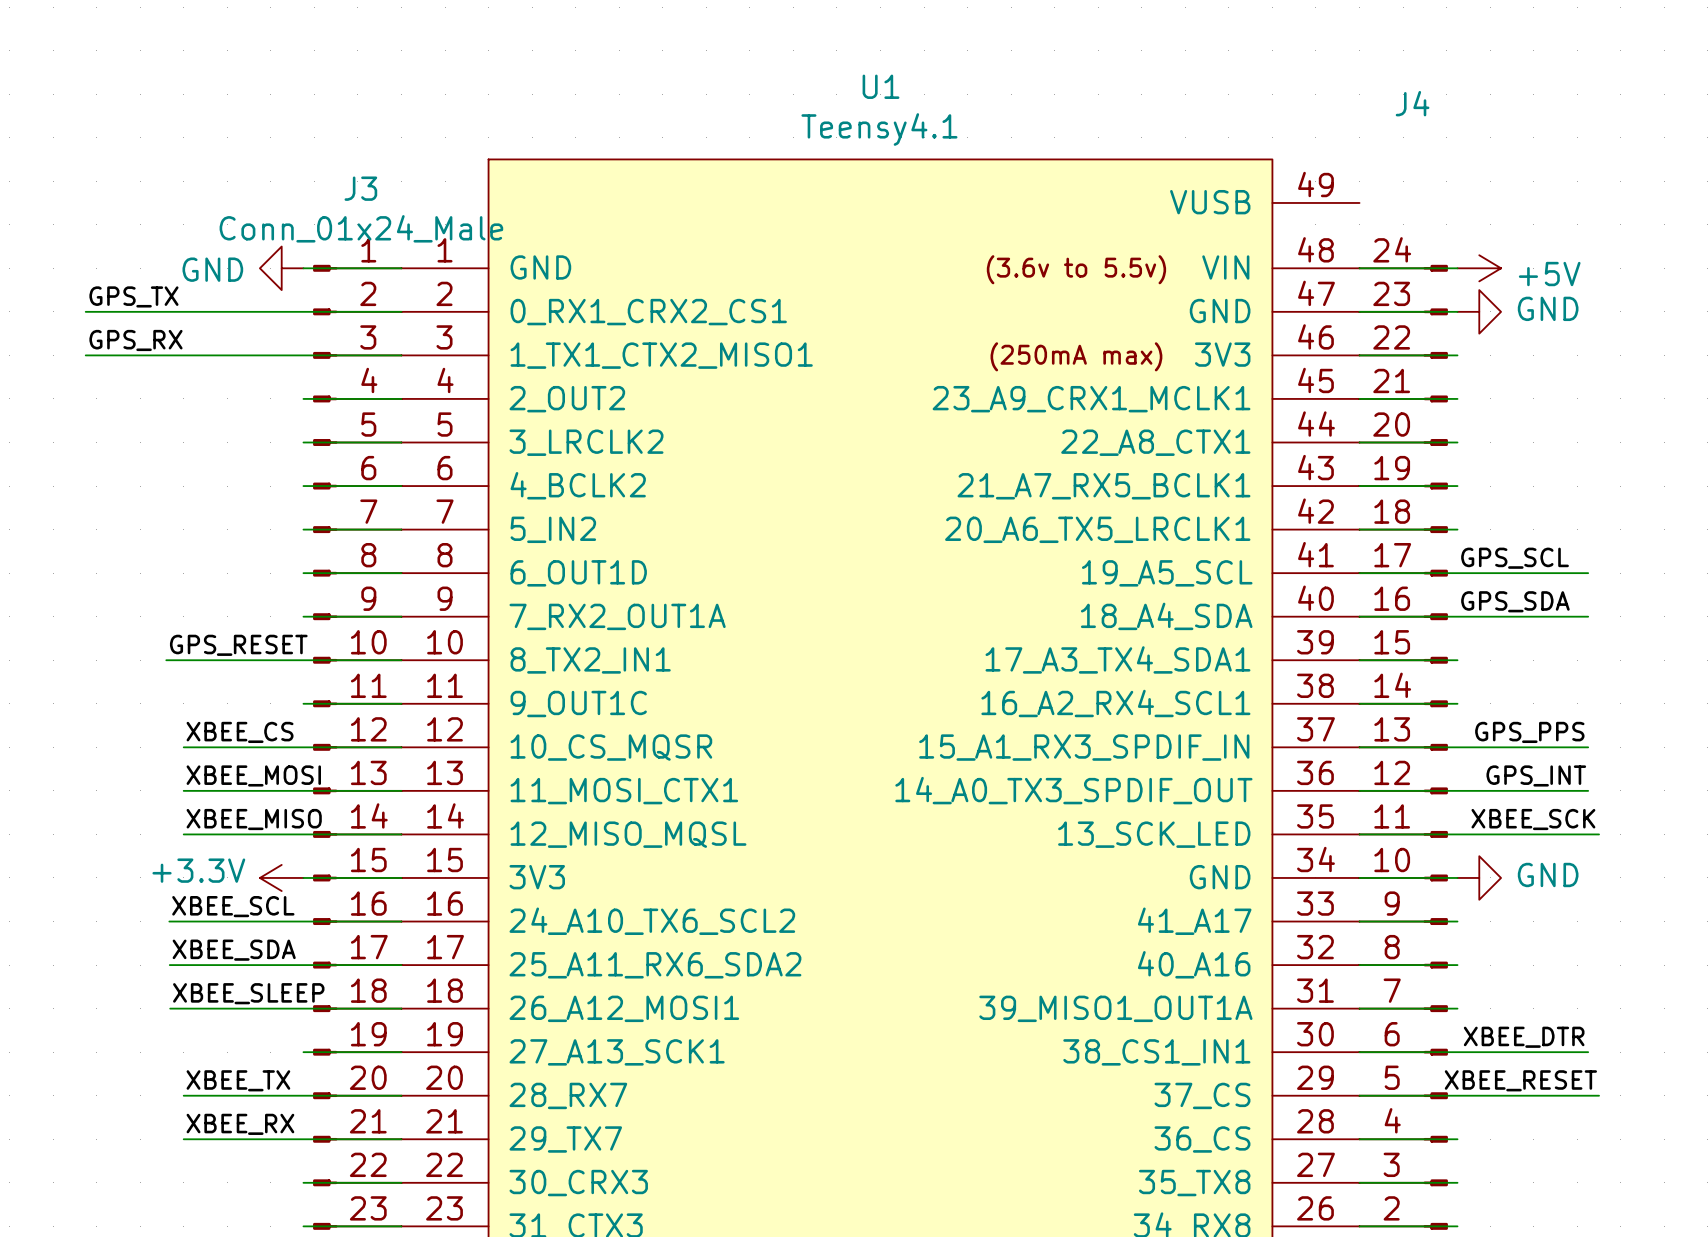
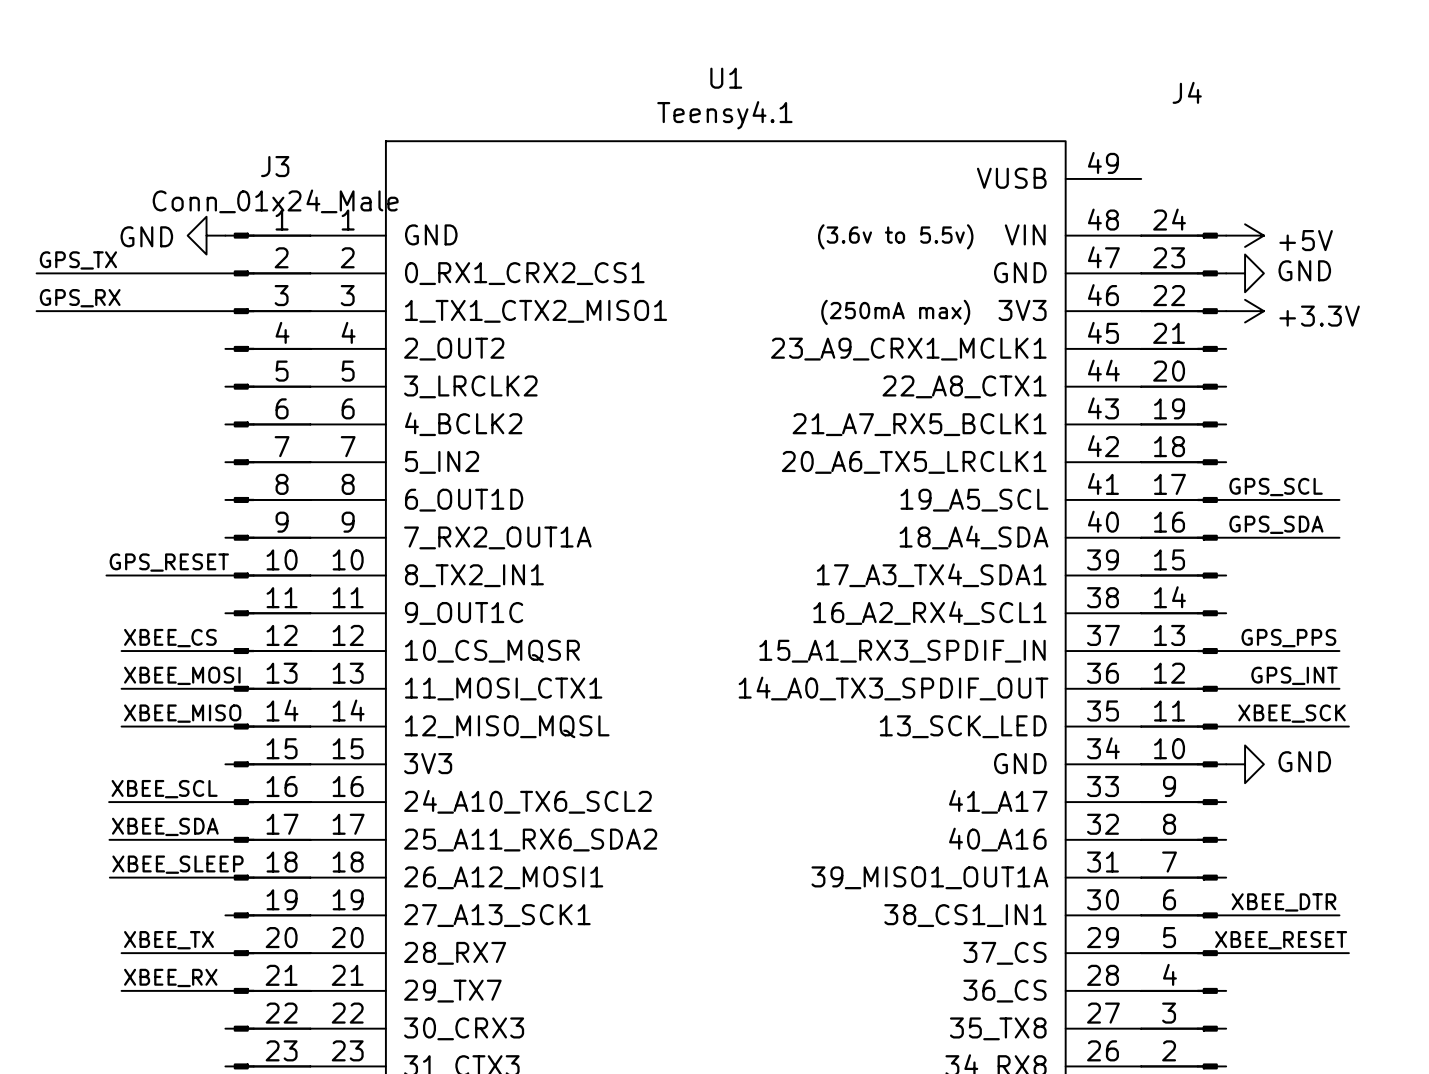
power symbol: none -> +3.3V (1245, 311)
power symbol: +3.3V (281, 877) -> none

